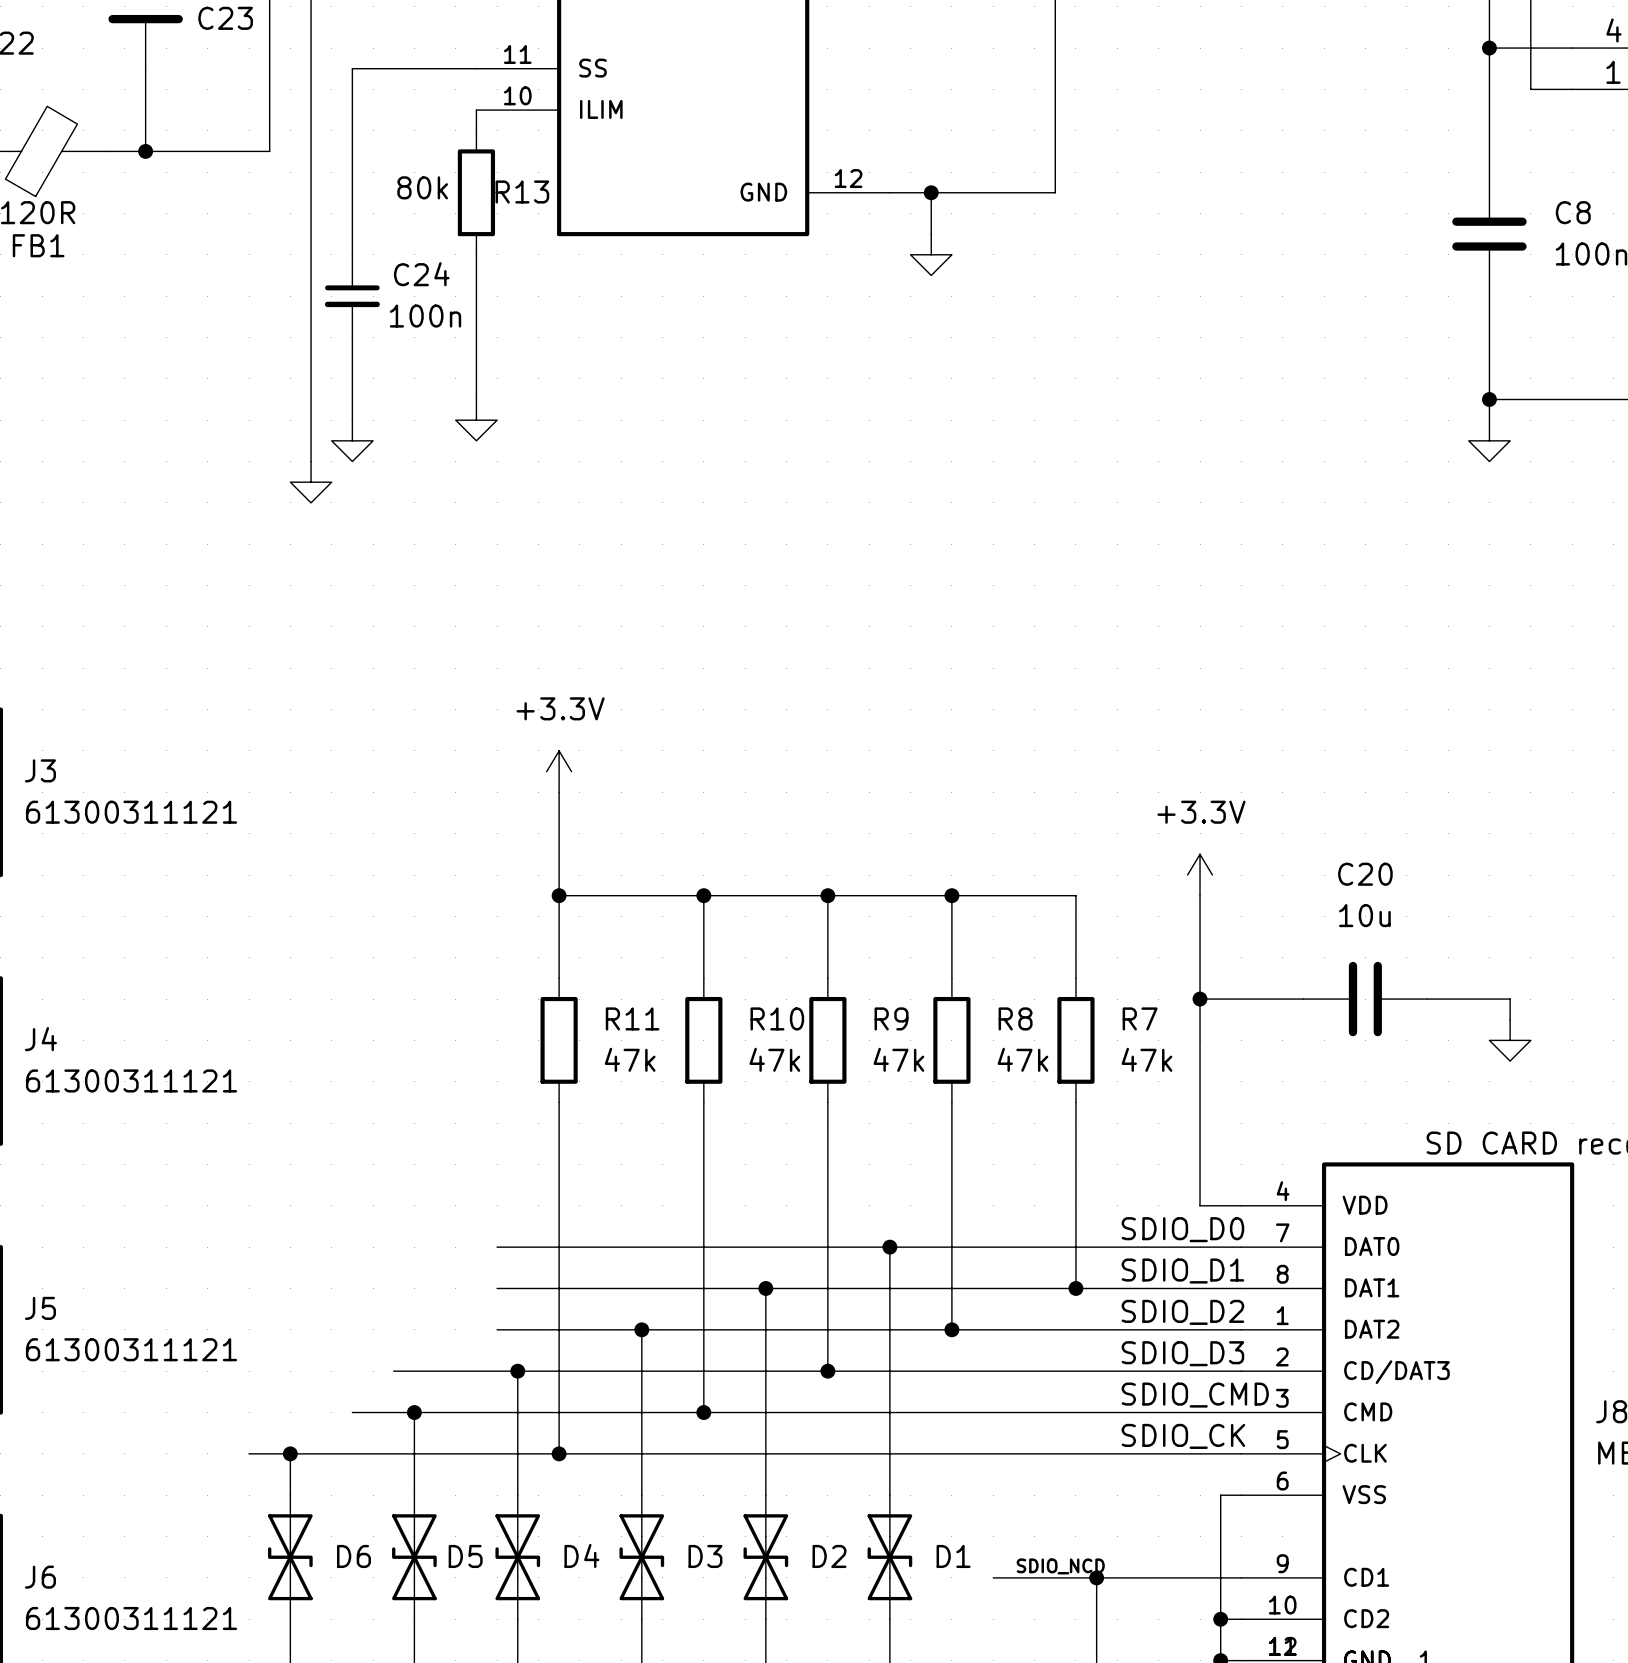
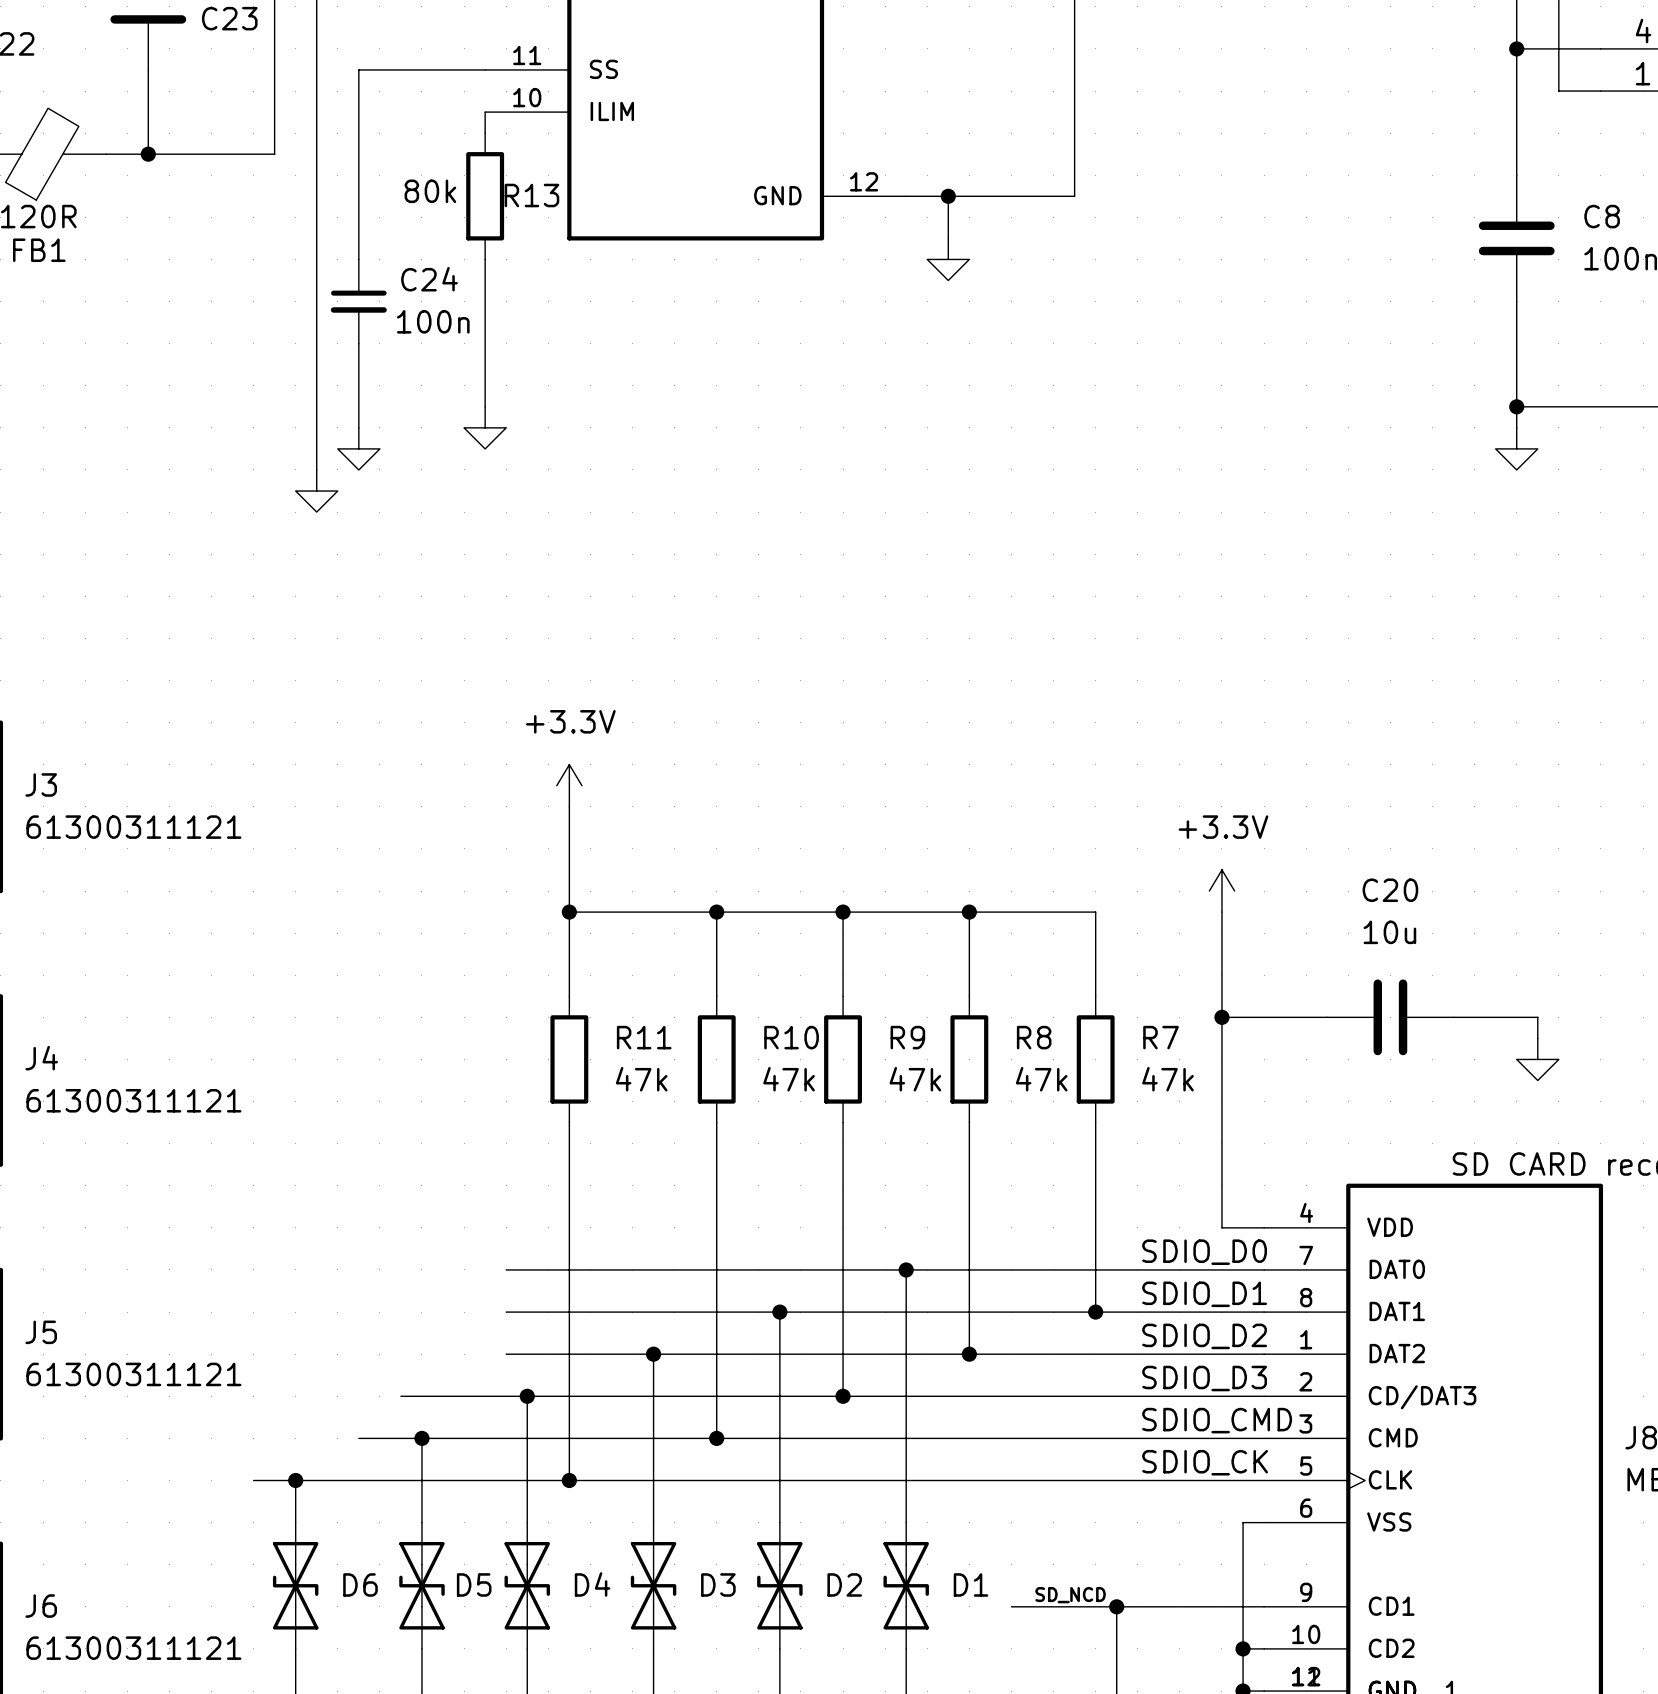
label: SDIO_NCD (1060, 1566) -> SD_NCD (1070, 1595)

